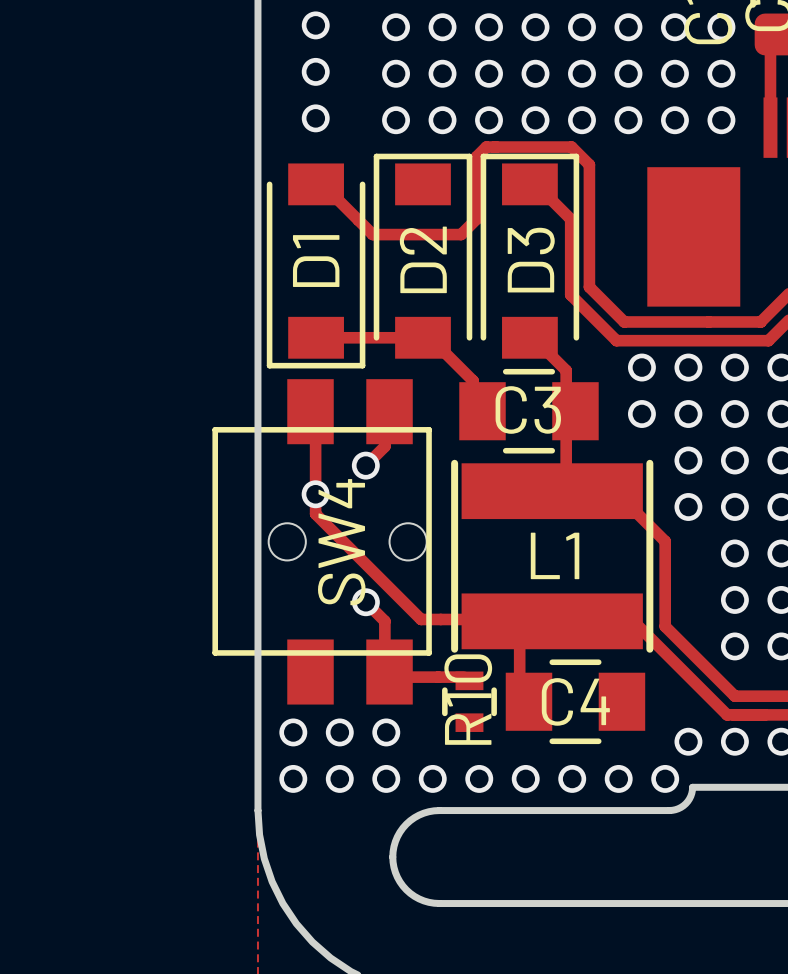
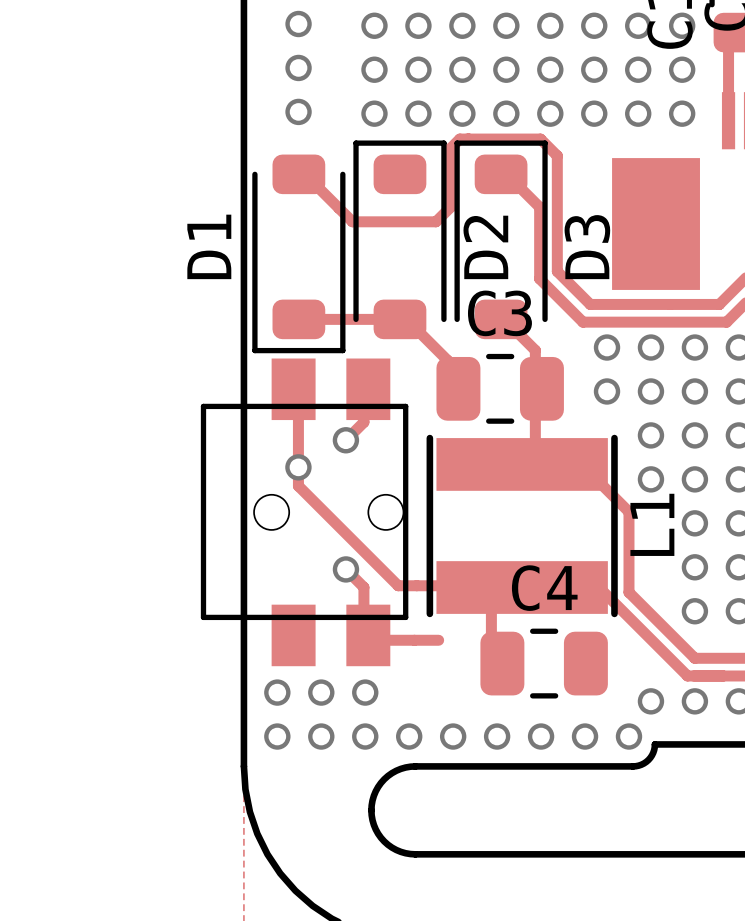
D2 footprint: [373, 153, 473, 359] -> [353, 140, 447, 340]
D3 footprint: [480, 153, 580, 359] -> [454, 140, 548, 340]
D1 footprint: [266, 163, 366, 369] -> [252, 154, 346, 354]
D2 name position: D2 (423, 259) -> D2 (485, 247)
D3 name position: D3 (531, 260) -> D3 (587, 247)
D1 name position: D1 (316, 261) -> D1 (209, 246)
C3 footprint: [459, 368, 599, 454] -> [436, 353, 564, 424]
C3 name position: C3 (528, 409) -> C3 (499, 313)
SW4 name: SW4 (341, 542) -> none
L1 name rotation: 0° (555, 555) -> 90° counterclockwise (652, 524)
L1 name position: L1 (555, 555) -> L1 (652, 524)
C4 footprint: [505, 659, 646, 745] -> [480, 628, 608, 699]
R10: (469, 701) -> none
C4 name position: C4 (575, 701) -> C4 (544, 588)

